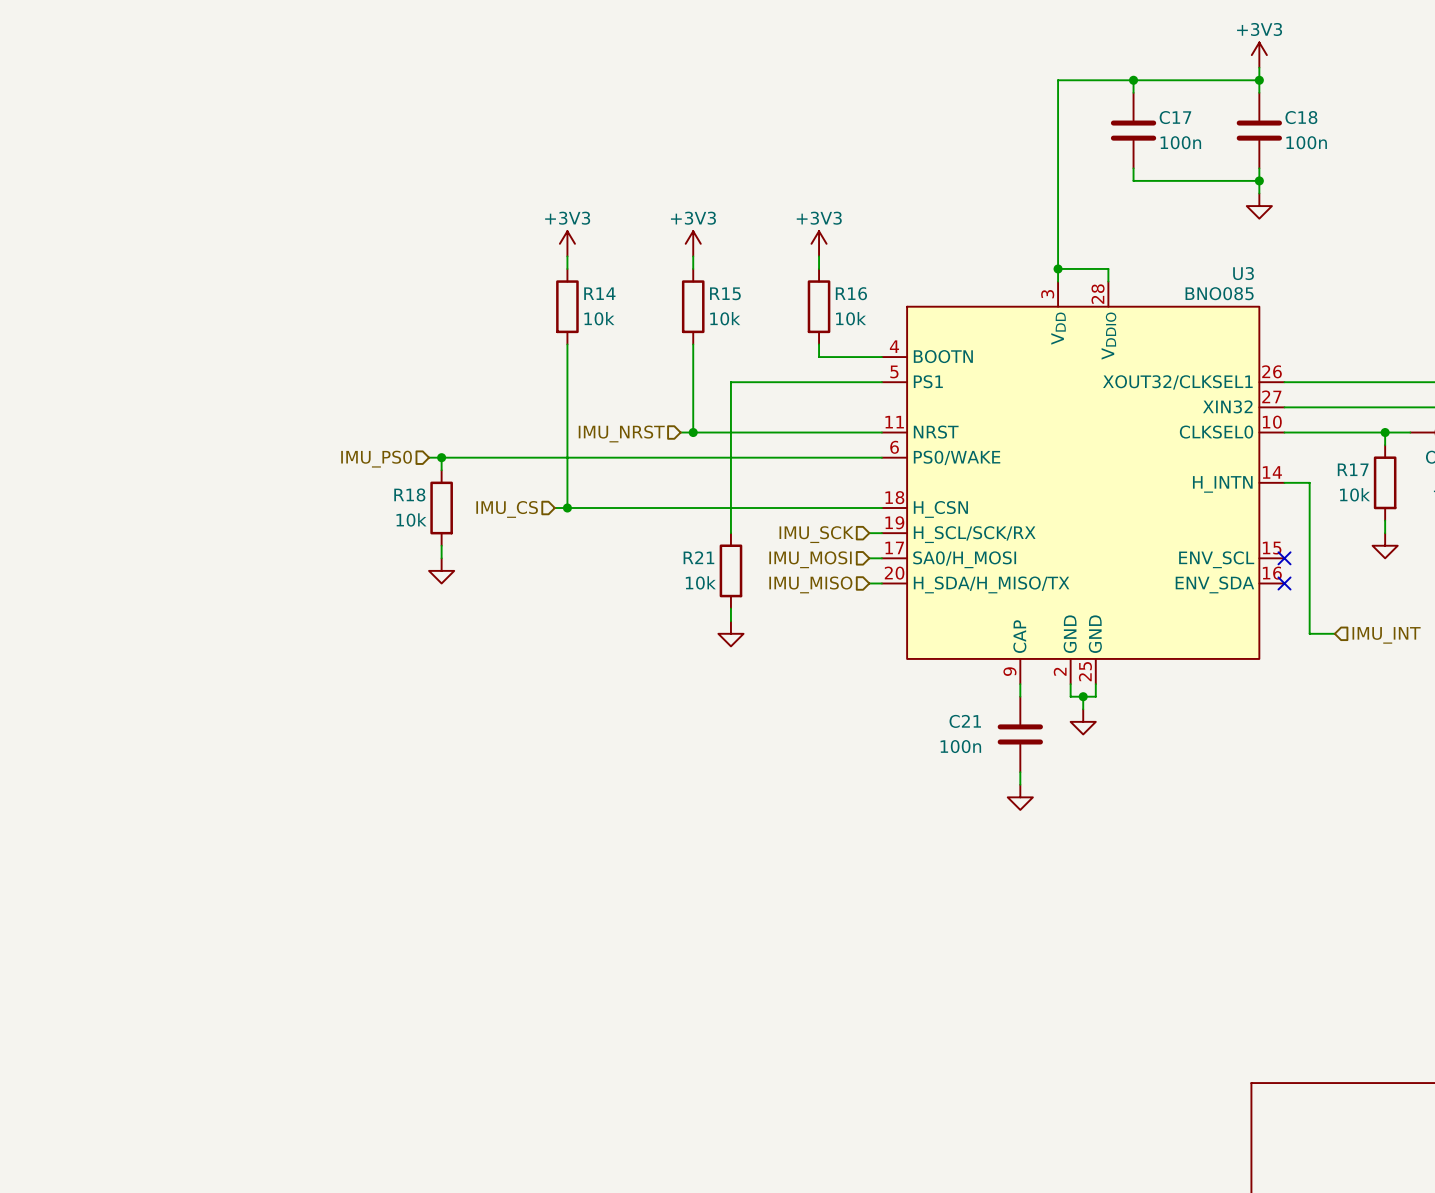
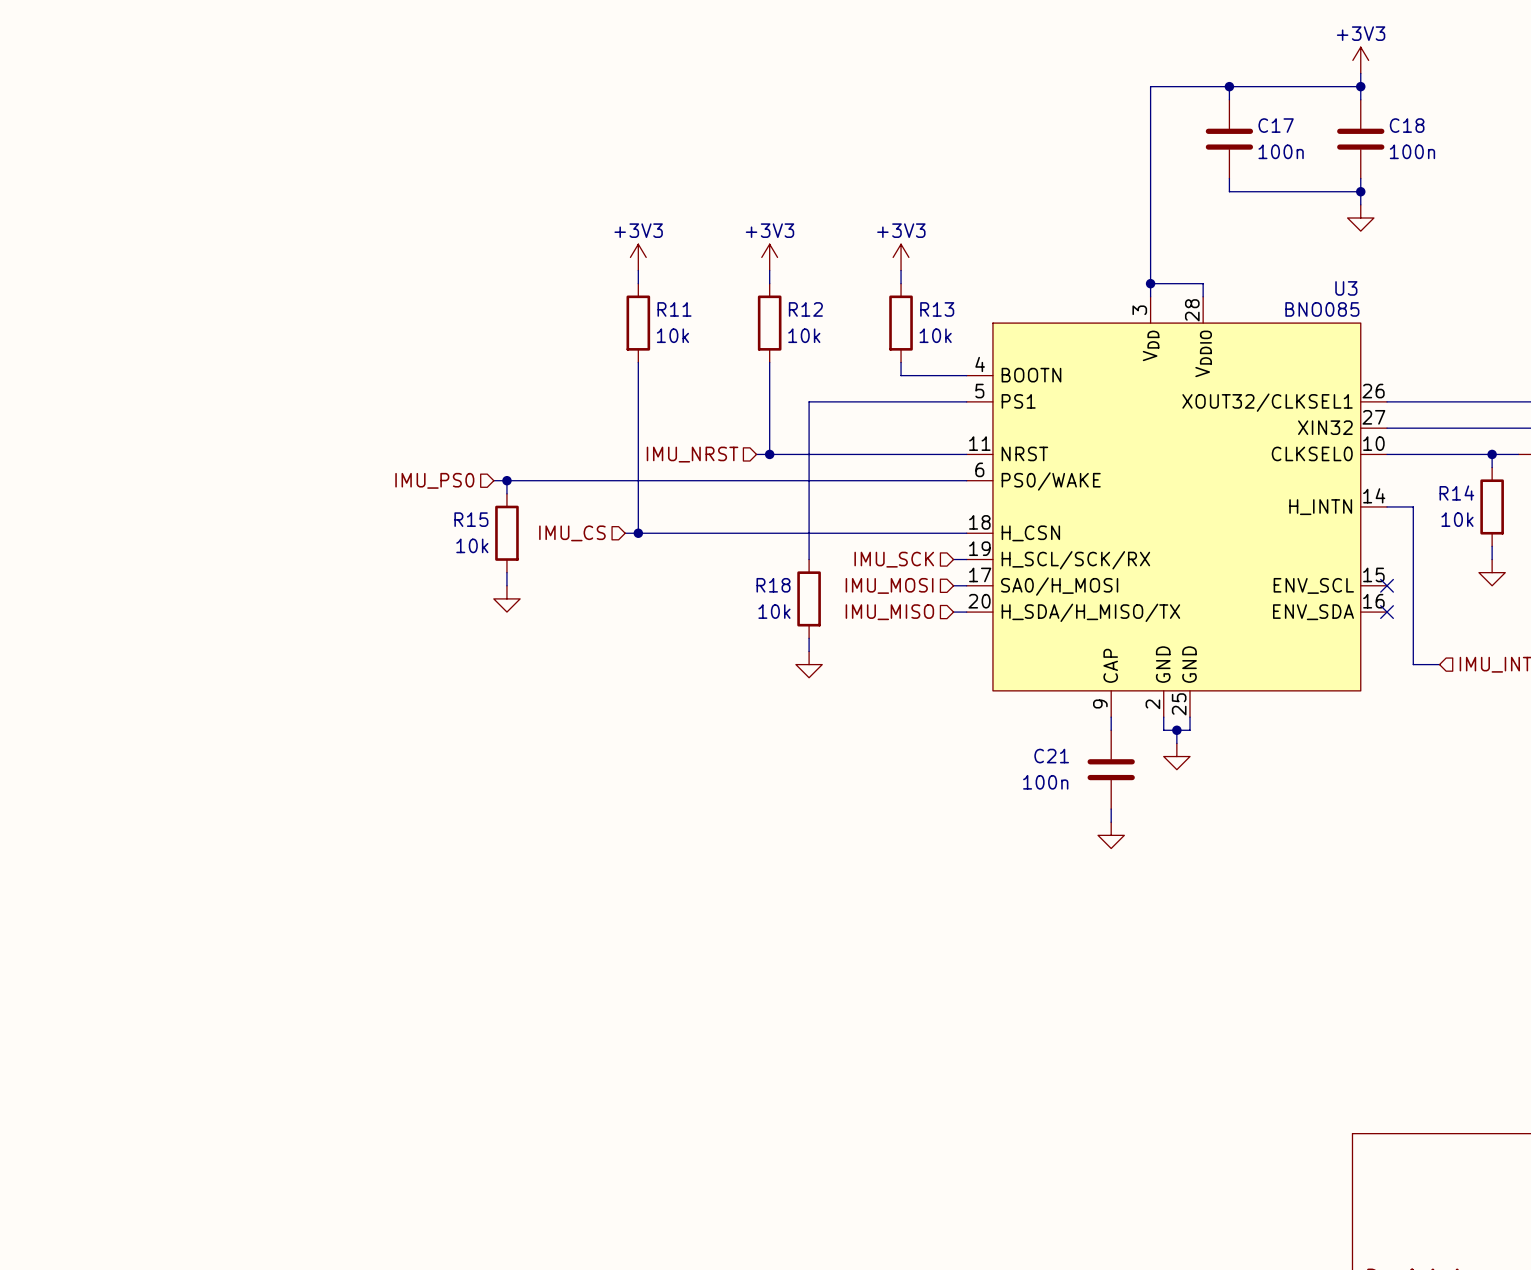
R14 name: R14 (599, 293) -> R11 (674, 309)
R15 name: R15 (725, 293) -> R12 (805, 309)
R16 name: R16 (851, 293) -> R13 (937, 309)
R17 name: R17 (1353, 469) -> R14 (1456, 493)
R18 name: R18 (409, 494) -> R15 (471, 519)
R21 name: R21 (698, 557) -> R18 (773, 585)

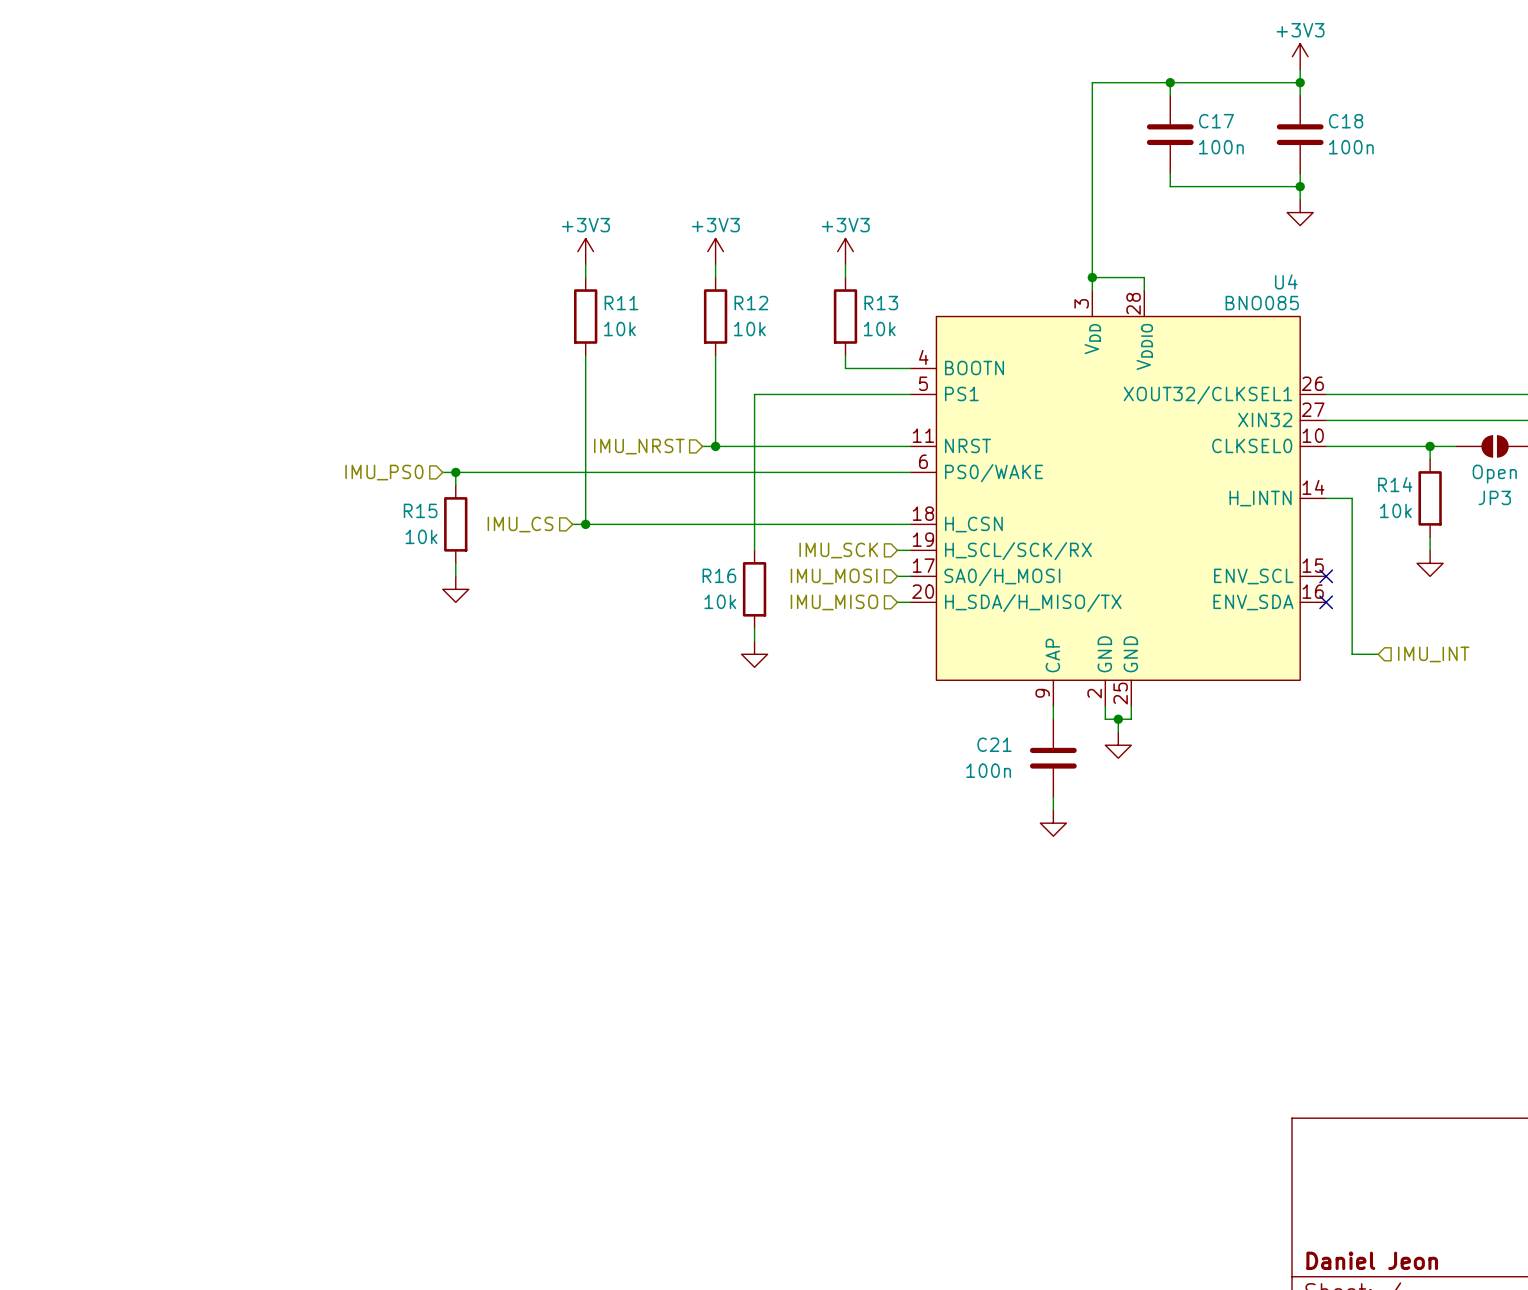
U3 name: U3 (1346, 288) -> U4 (1286, 281)
R18 name: R18 (773, 585) -> R16 (719, 575)

